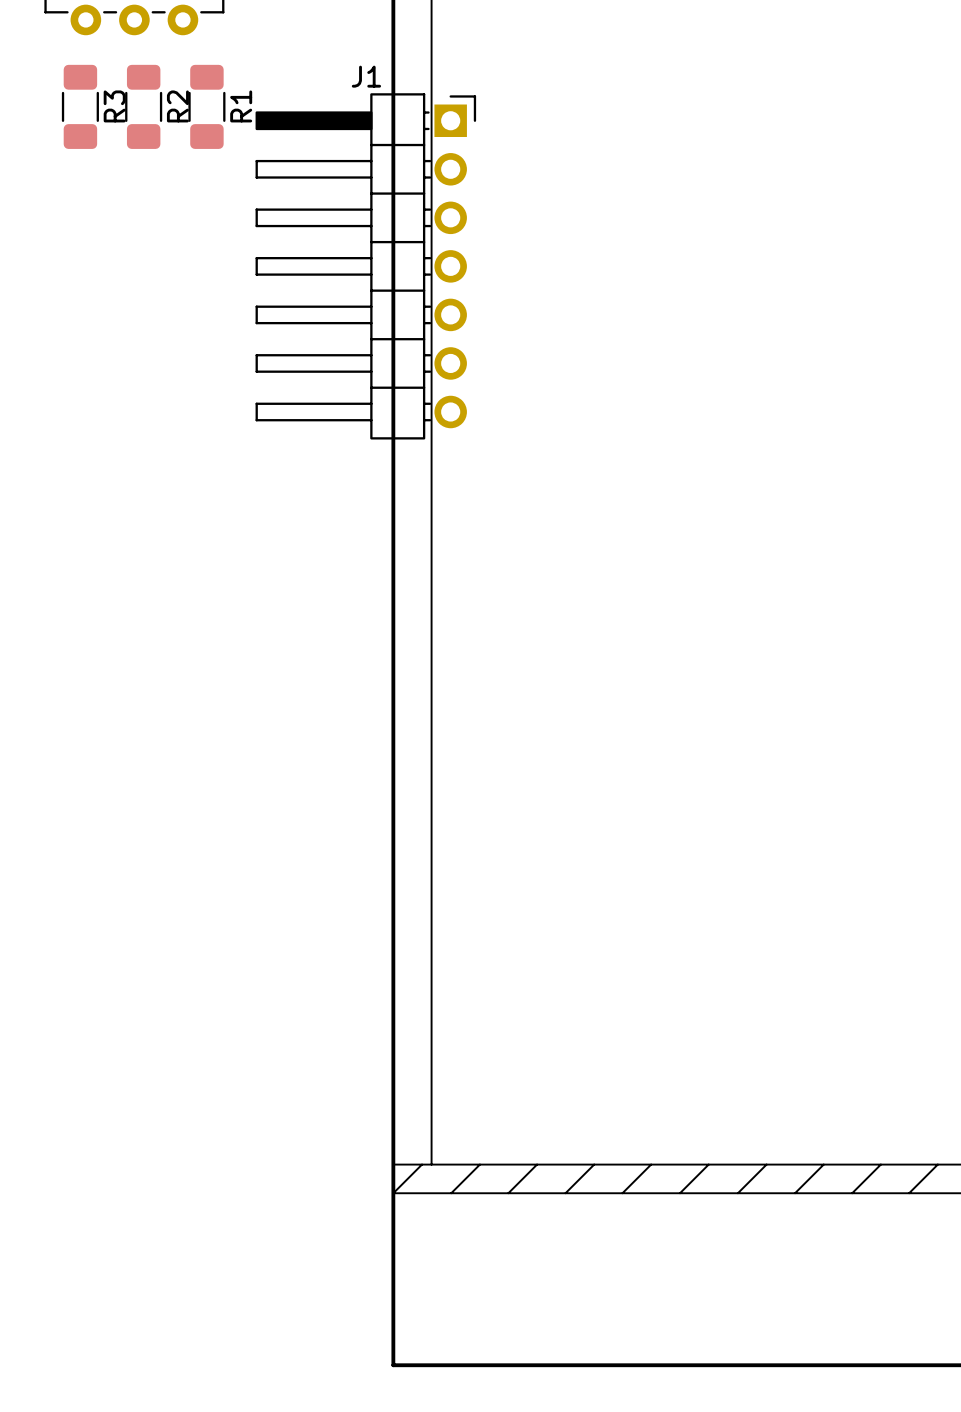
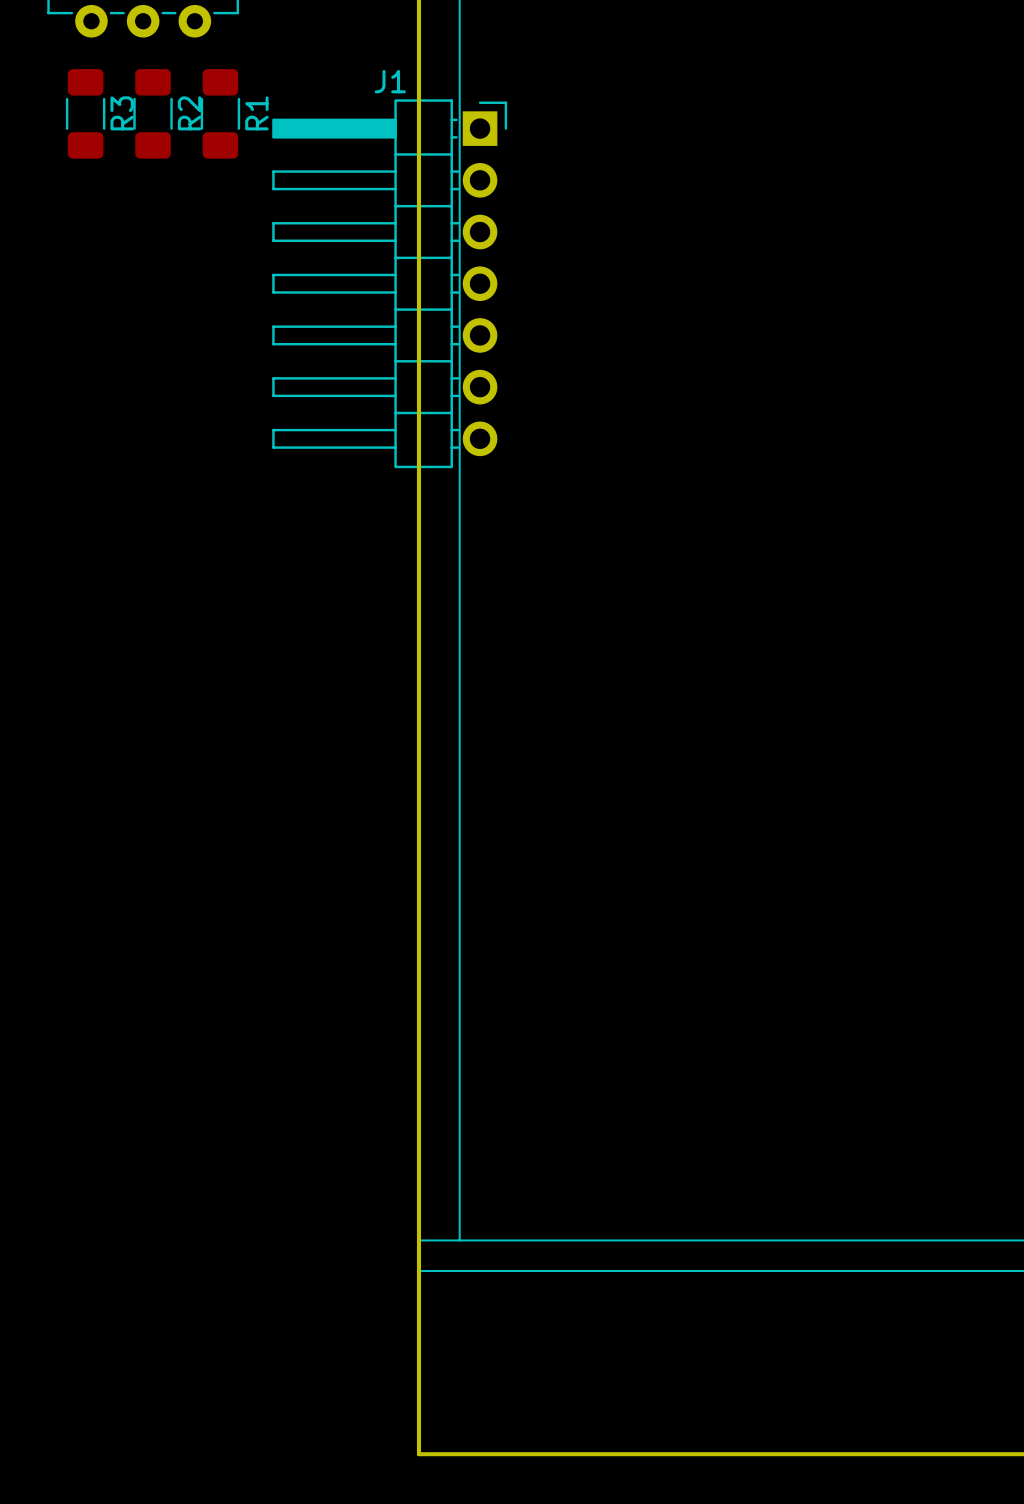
line: (422, 1164) (393, 1193) -> none
line: (479, 1164) (451, 1193) -> none
line: (537, 1164) (508, 1193) -> none
line: (594, 1164) (565, 1193) -> none
line: (651, 1164) (622, 1193) -> none
line: (708, 1164) (680, 1193) -> none
line: (766, 1164) (737, 1193) -> none
line: (823, 1164) (795, 1193) -> none
line: (880, 1164) (852, 1193) -> none
line: (937, 1164) (909, 1193) -> none

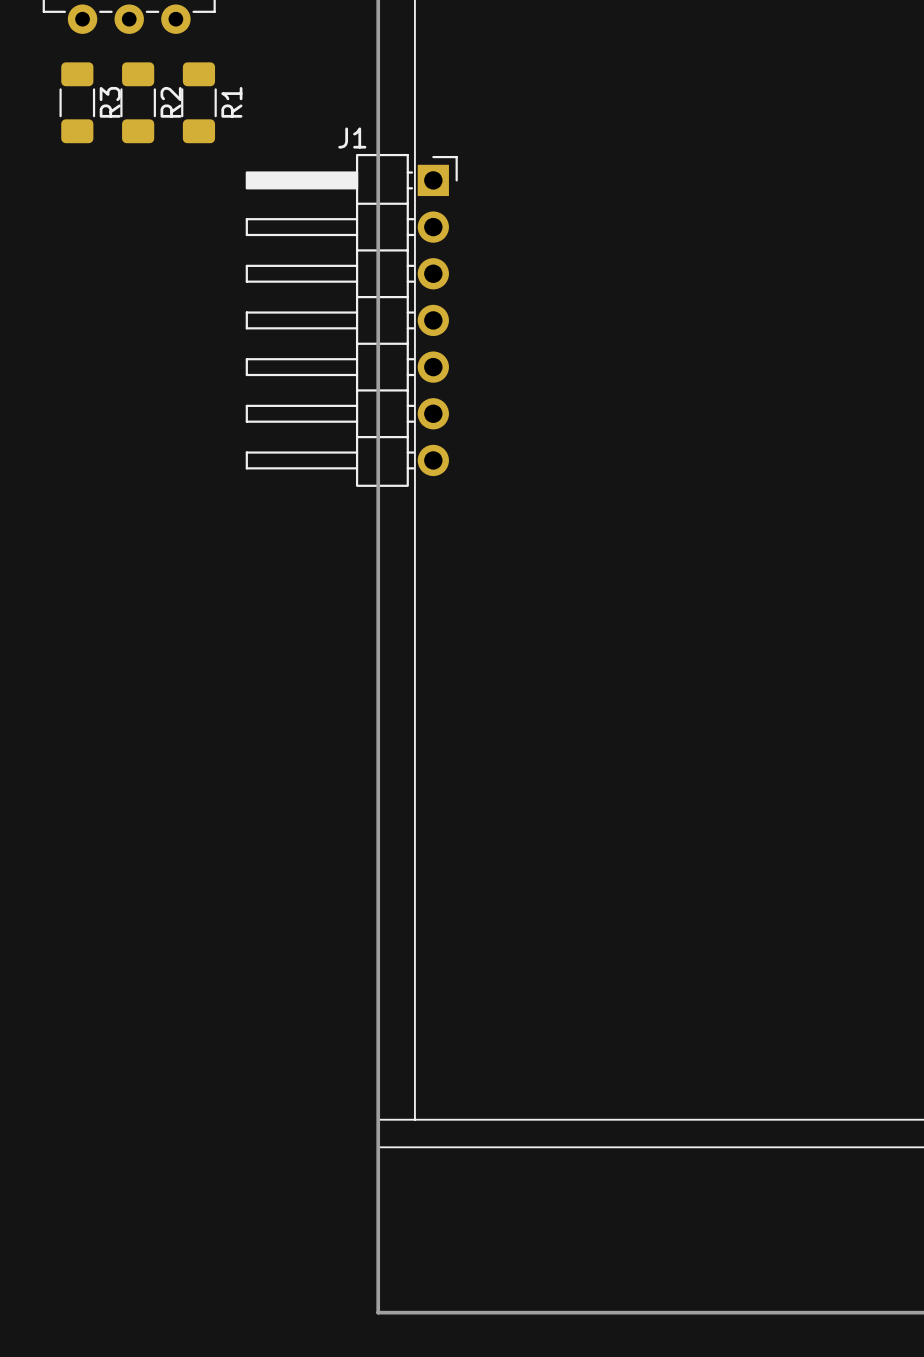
J1 position: (389, 283) -> (351, 320)

